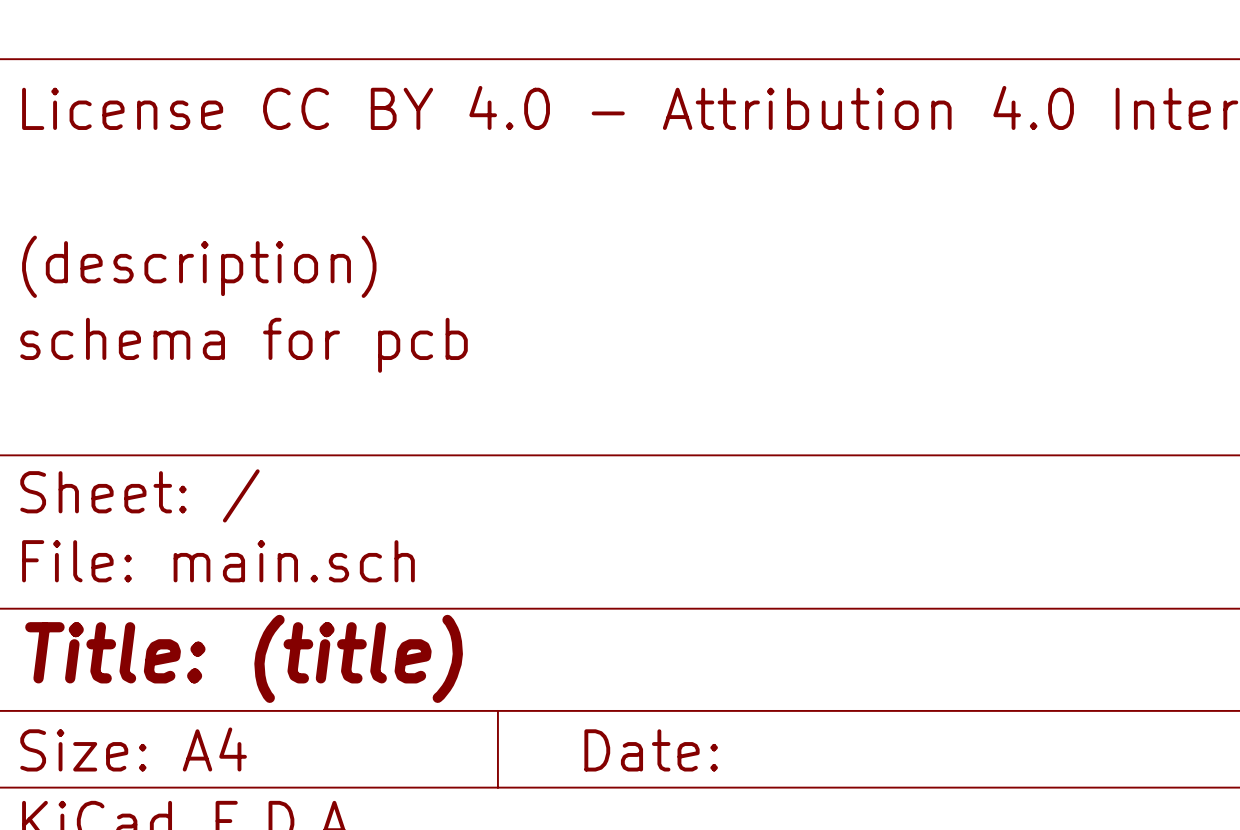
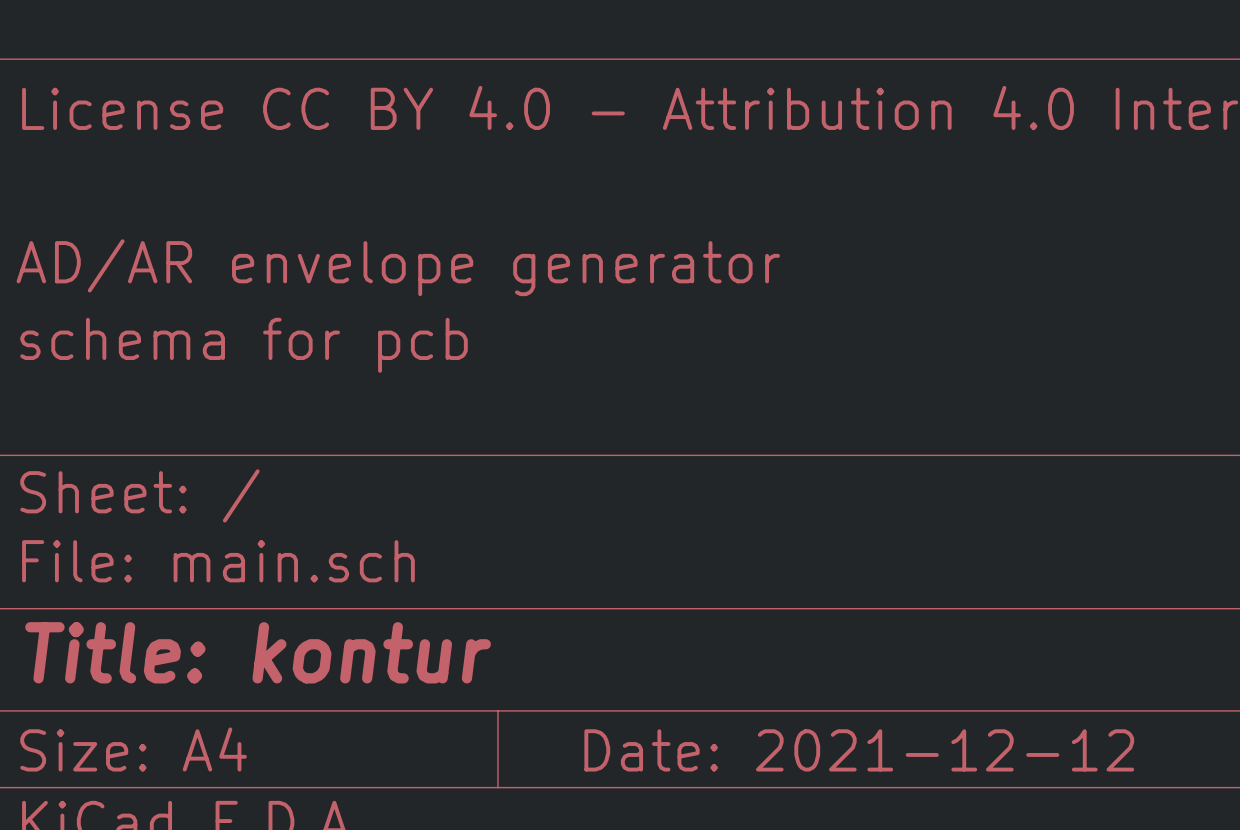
title block: (description) (199, 266) -> AD/AR envelope generator (398, 267)
title block: Title: (title) (244, 658) -> Title: kontur (258, 652)
title block: Date: (651, 750) -> Date: 2021-12-12 (859, 750)

